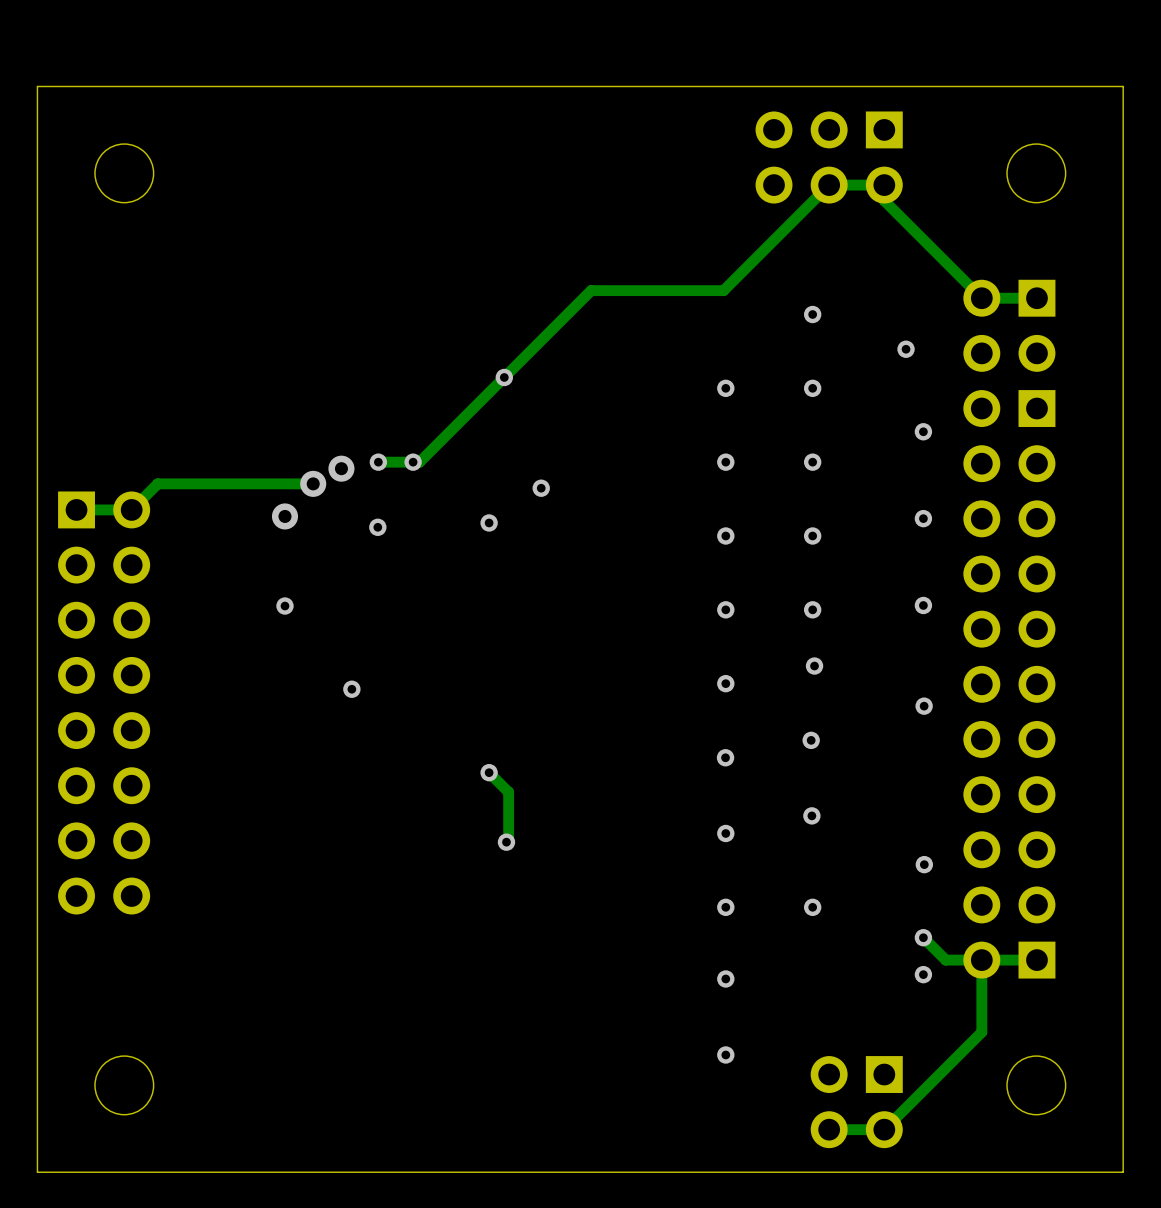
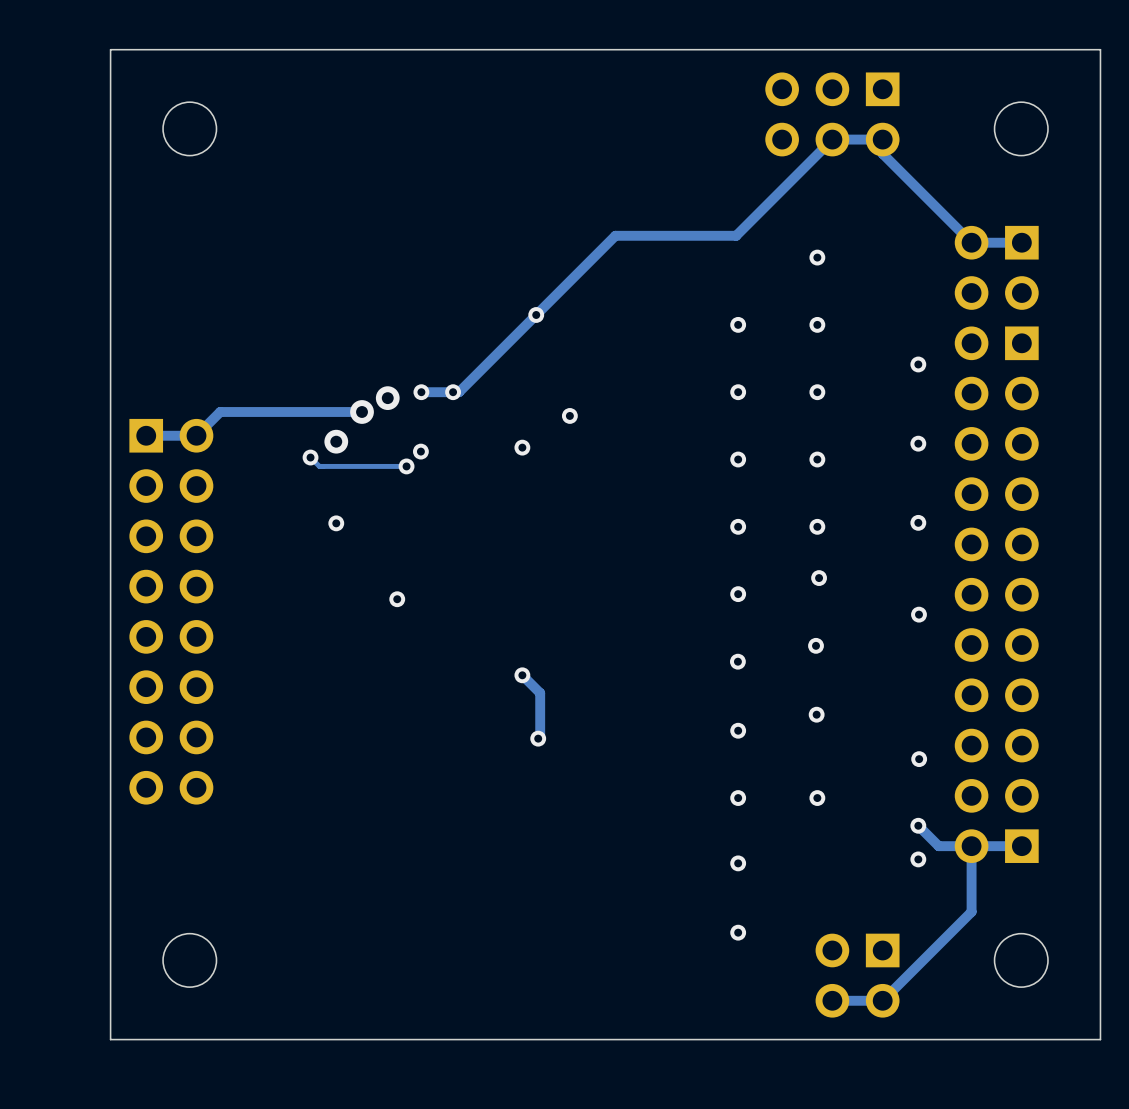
via: (906, 349) -> none
track: none -> (310, 457) (319, 466) (406, 466)
via: none -> (310, 457)
via: none -> (406, 466)

